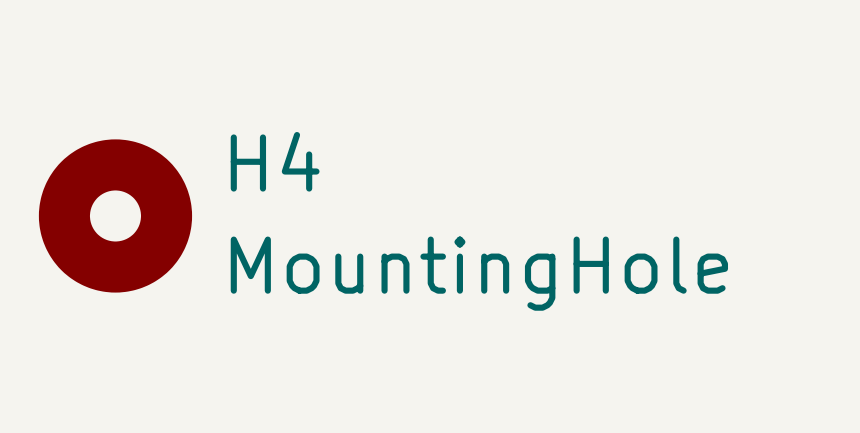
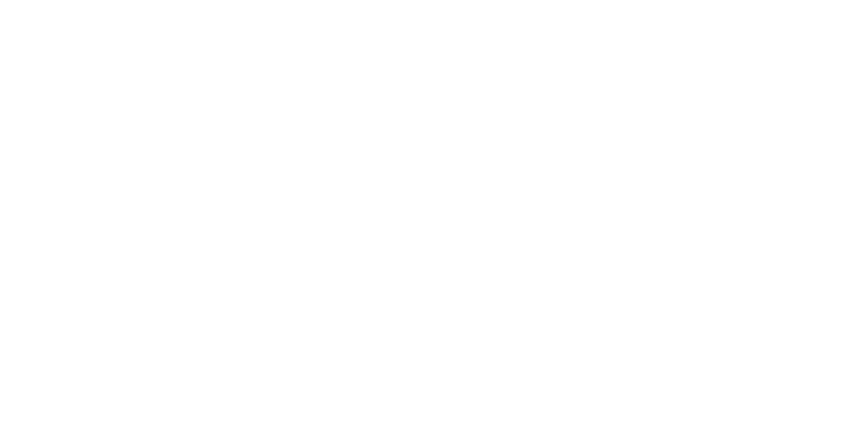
H4: MountingHole (115, 215) -> none

